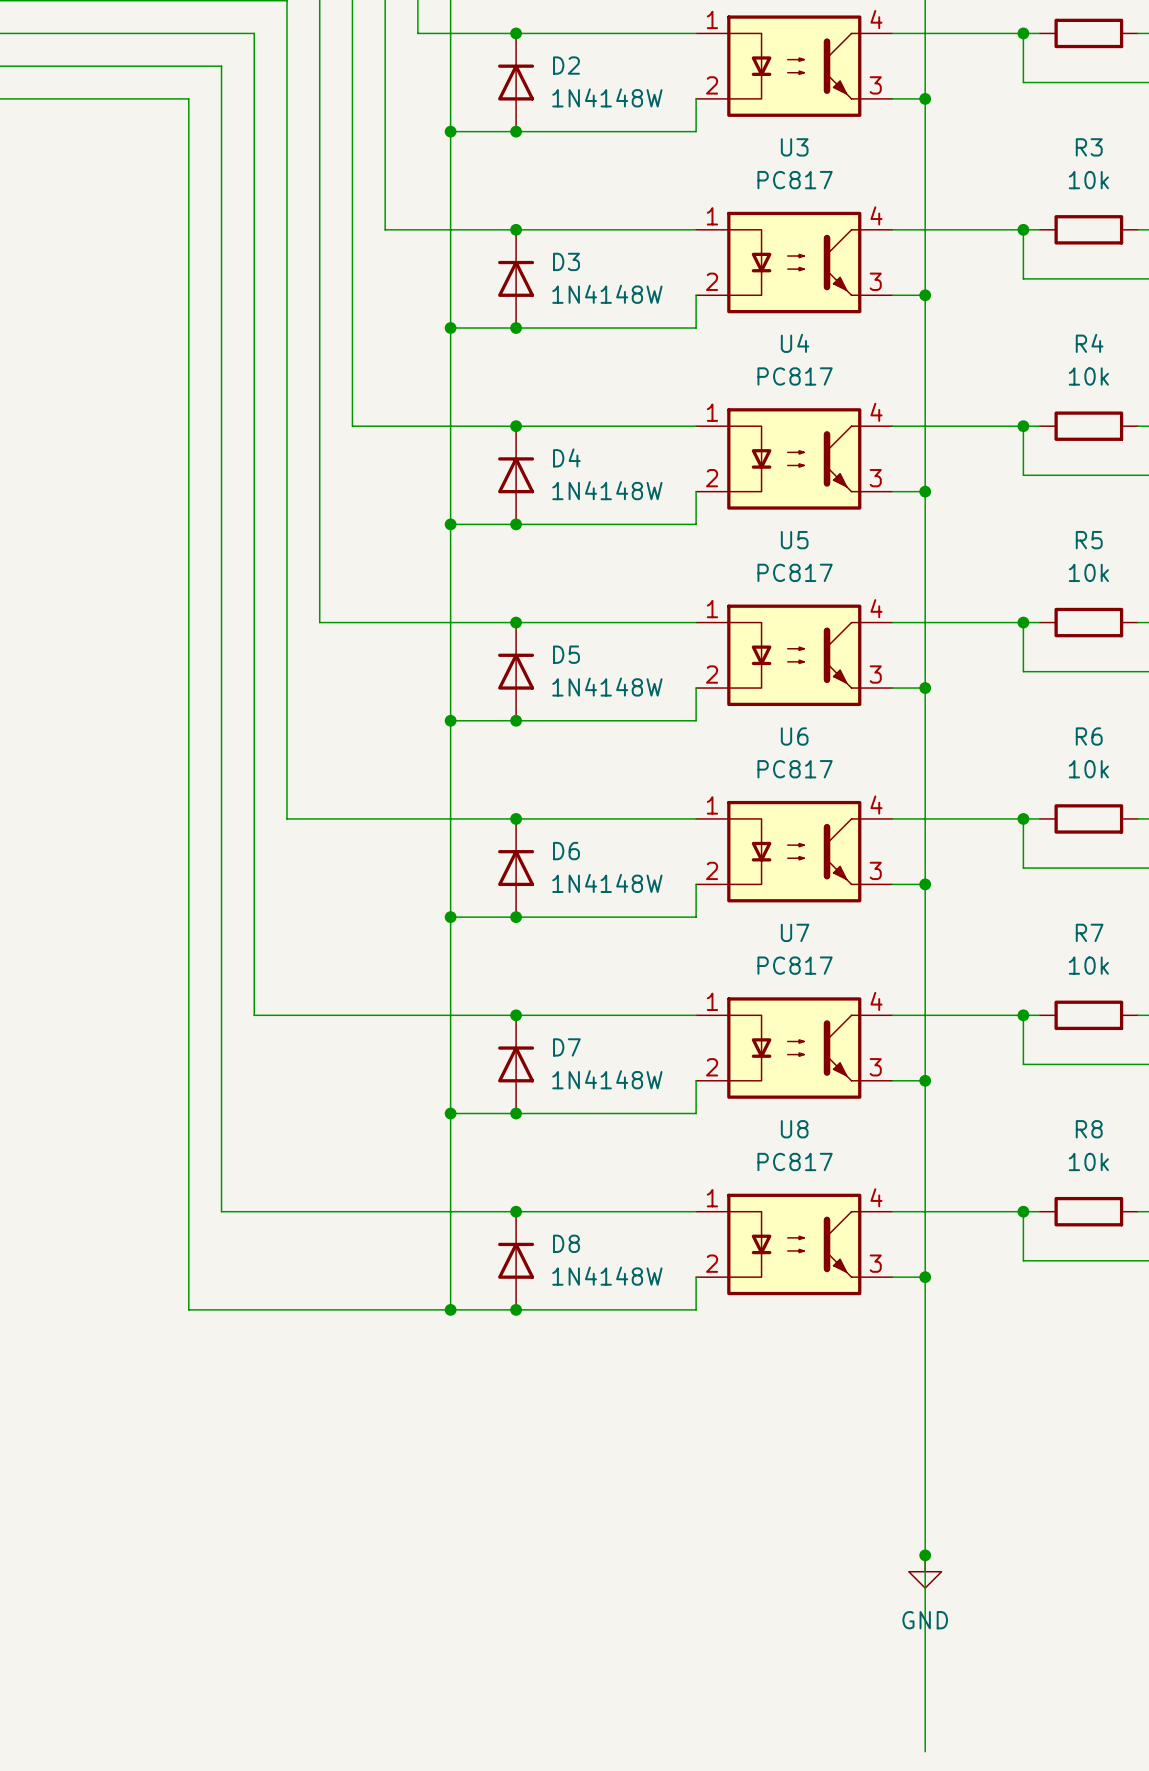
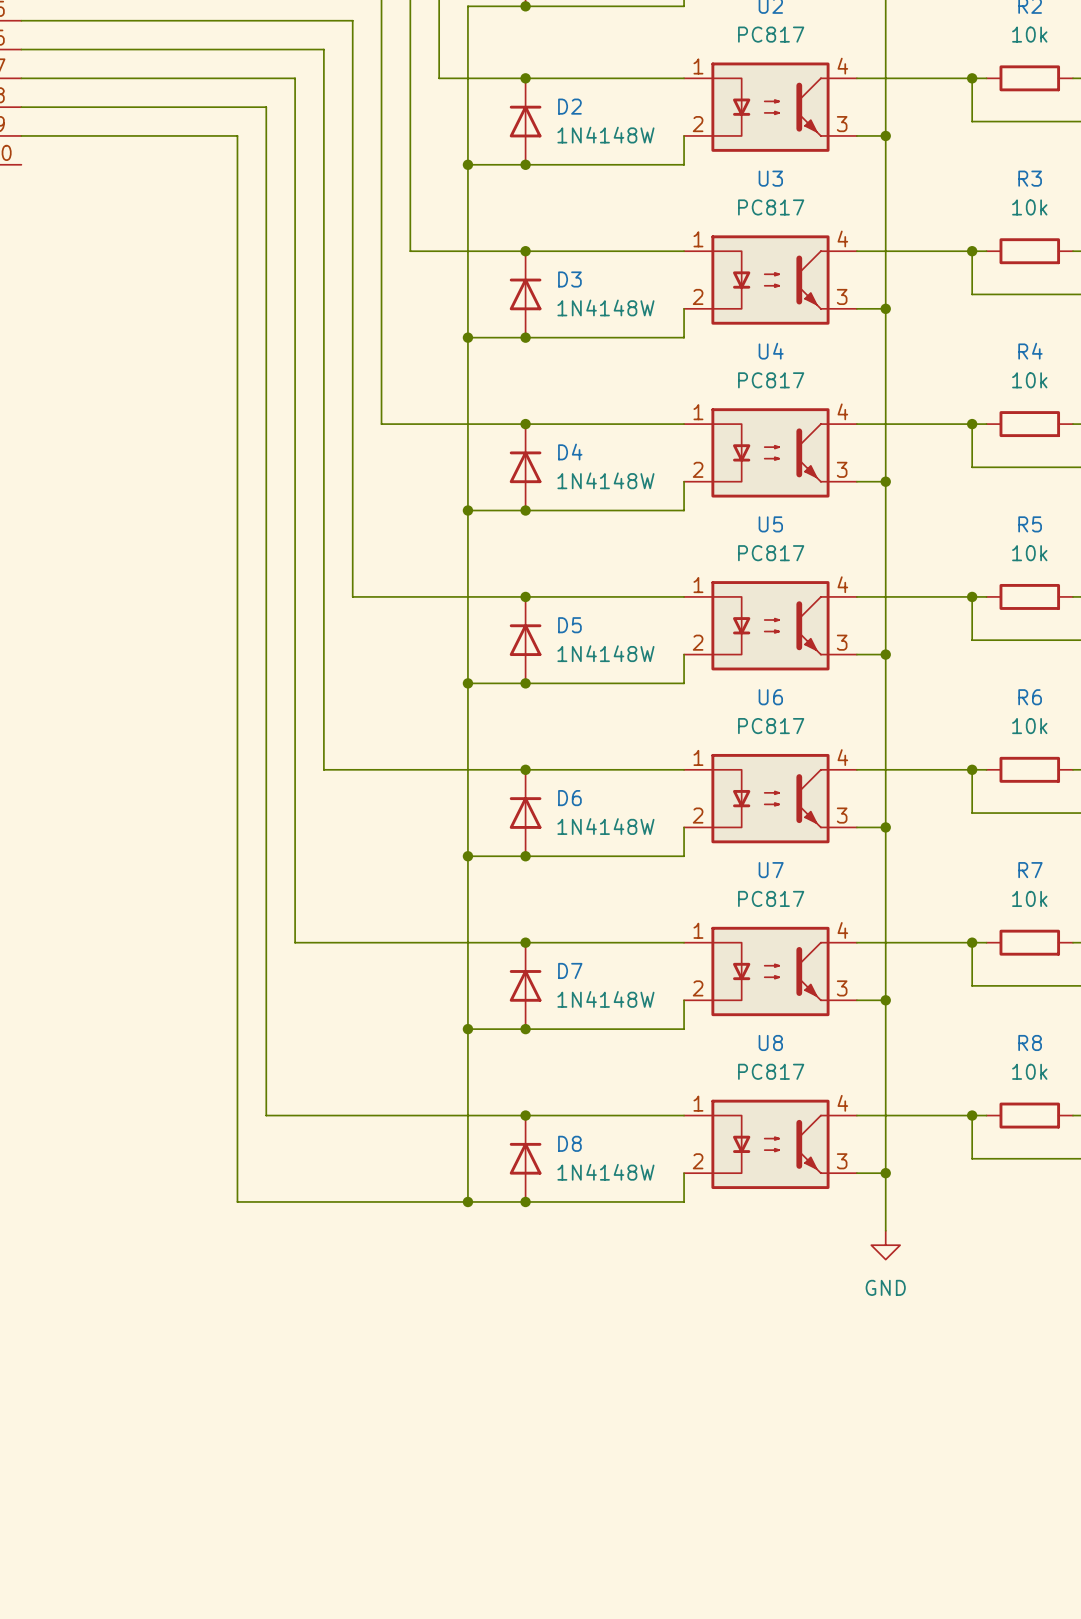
wire: (925, 1342) (925, 1751) -> none
junction: (925, 1555) -> none
power symbol position: GND (925, 1571) -> GND (885, 1245)

